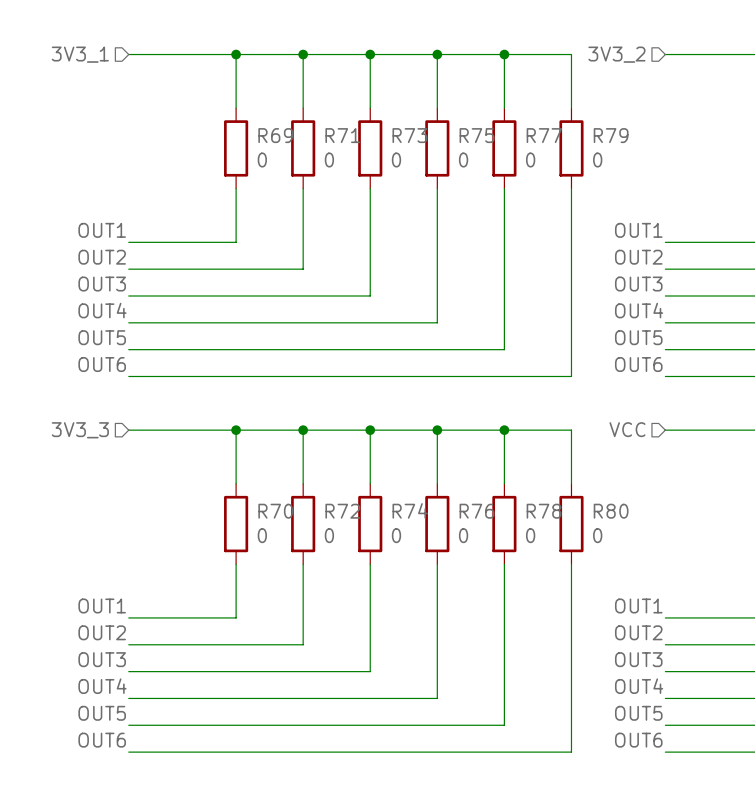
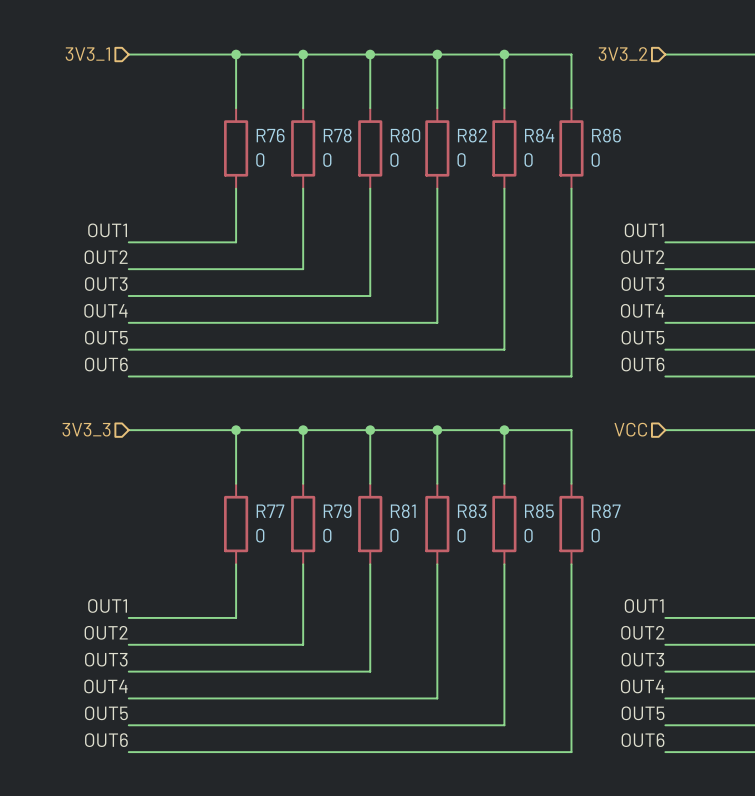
R69 name: R69 (275, 135) -> R76 (270, 135)
R71 name: R71 (342, 135) -> R78 (337, 135)
R73 name: R73 (409, 135) -> R80 (405, 135)
R75 name: R75 (476, 135) -> R82 (472, 135)
R77 name: R77 (544, 135) -> R84 (539, 135)
R79 name: R79 (611, 135) -> R86 (606, 135)
R74 name: R74 (410, 510) -> R81 (403, 511)
R70 name: R70 (275, 511) -> R77 (270, 511)
R72 name: R72 (342, 511) -> R79 (337, 511)
R76 name: R76 (476, 511) -> R83 (472, 511)
R78 name: R78 (544, 511) -> R85 (539, 511)
R80 name: R80 (611, 511) -> R87 (606, 511)

